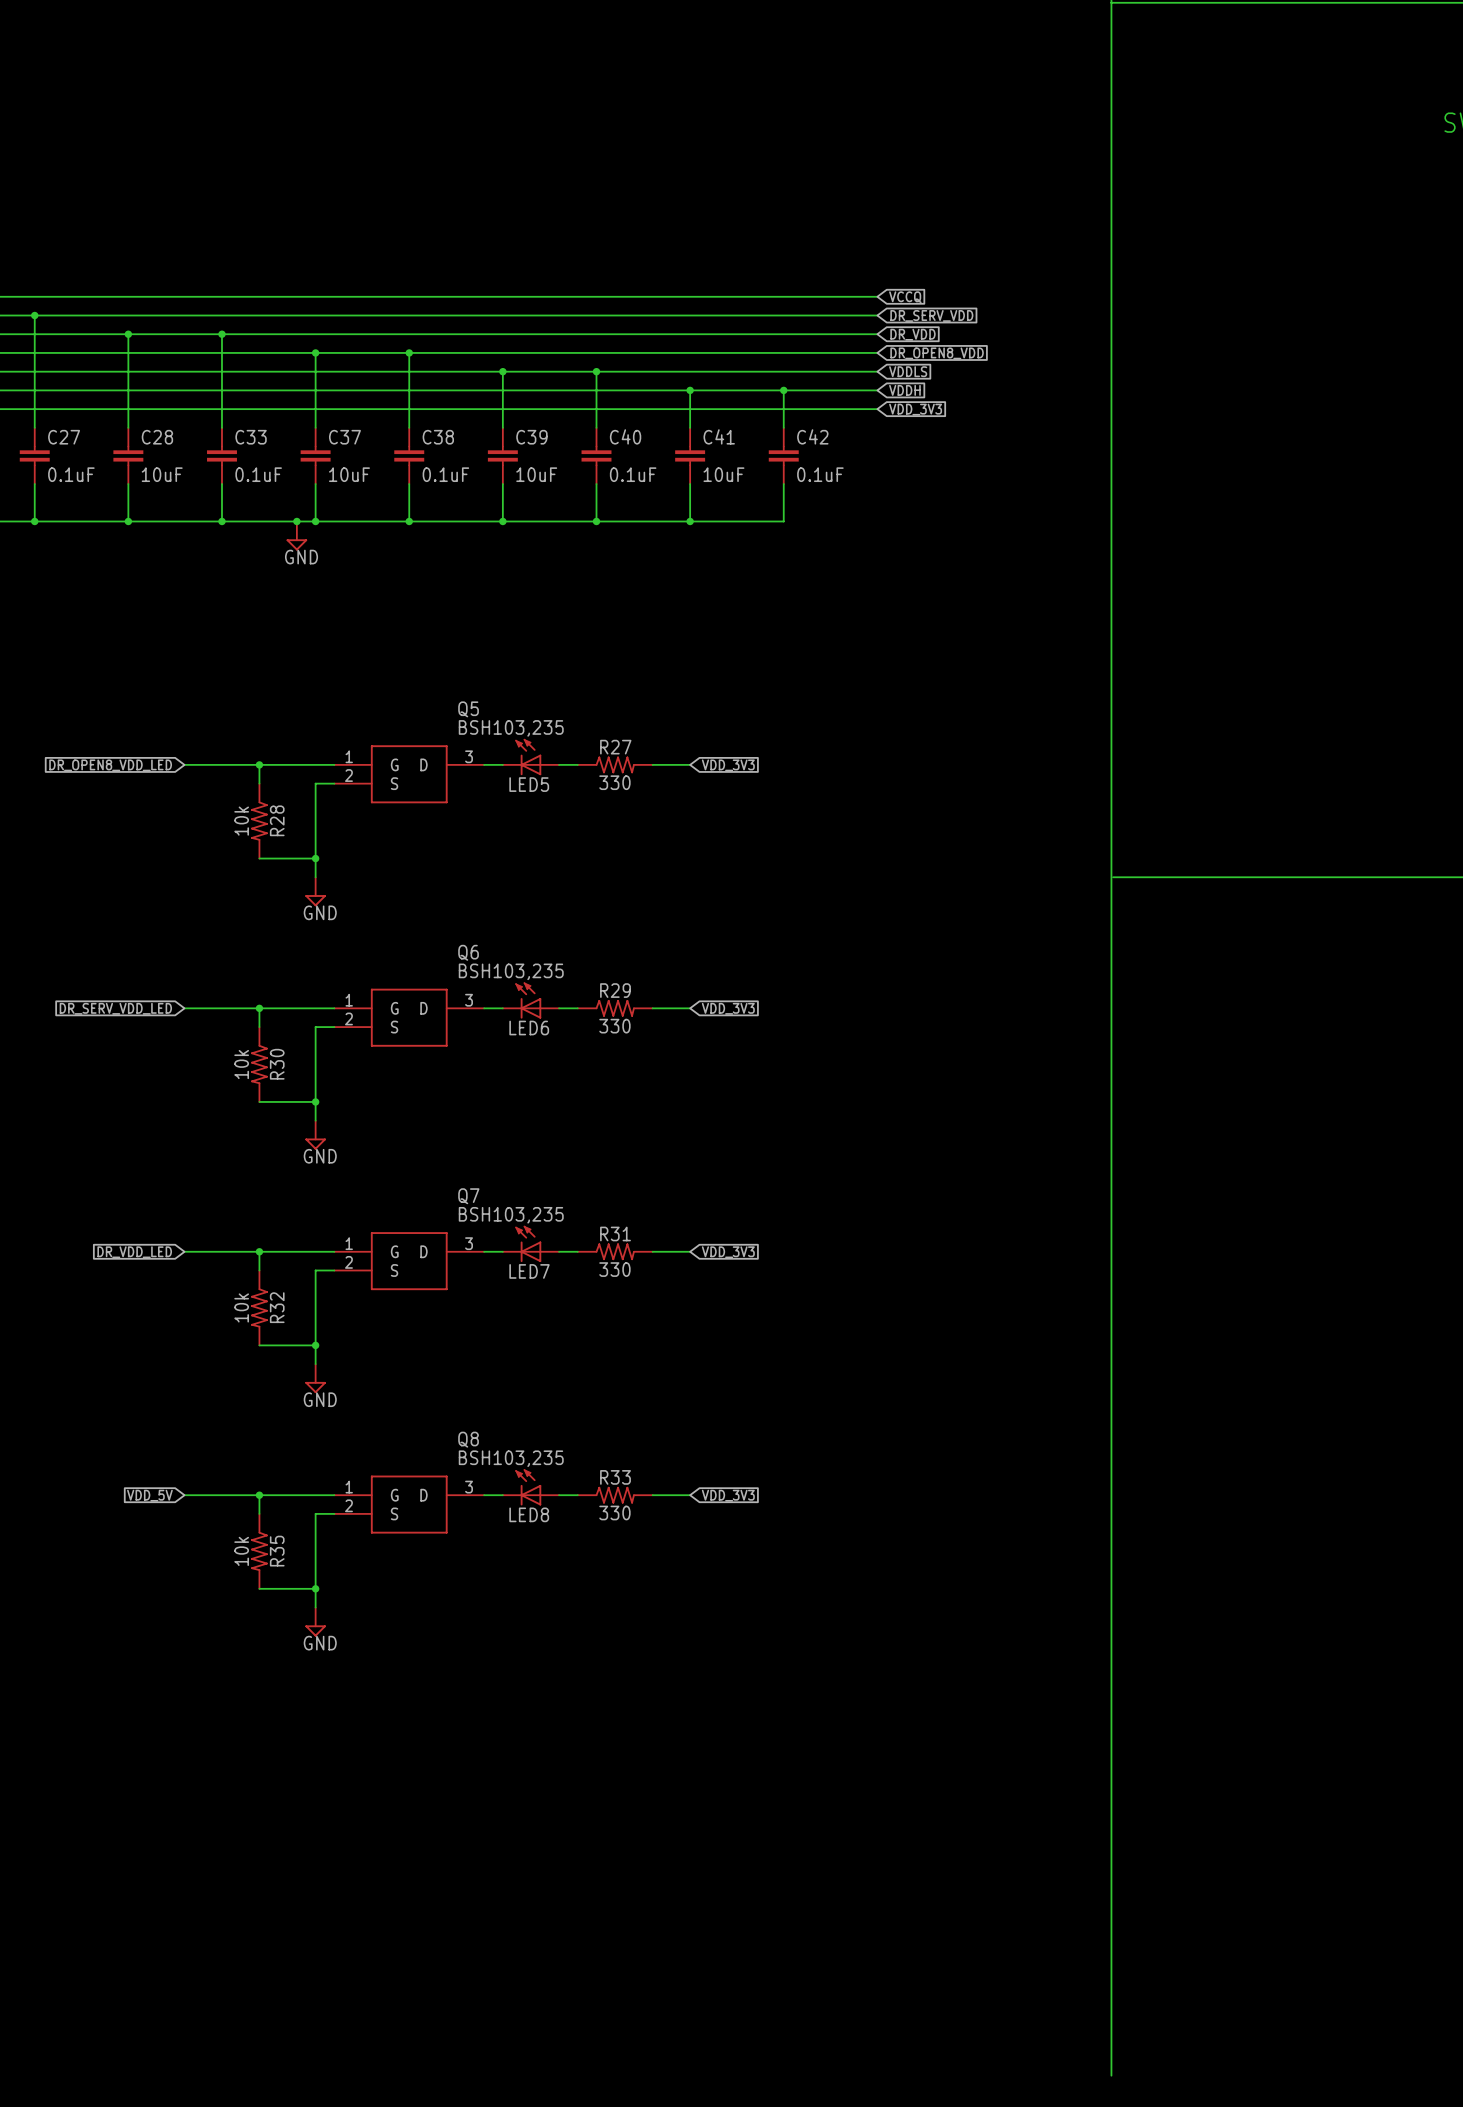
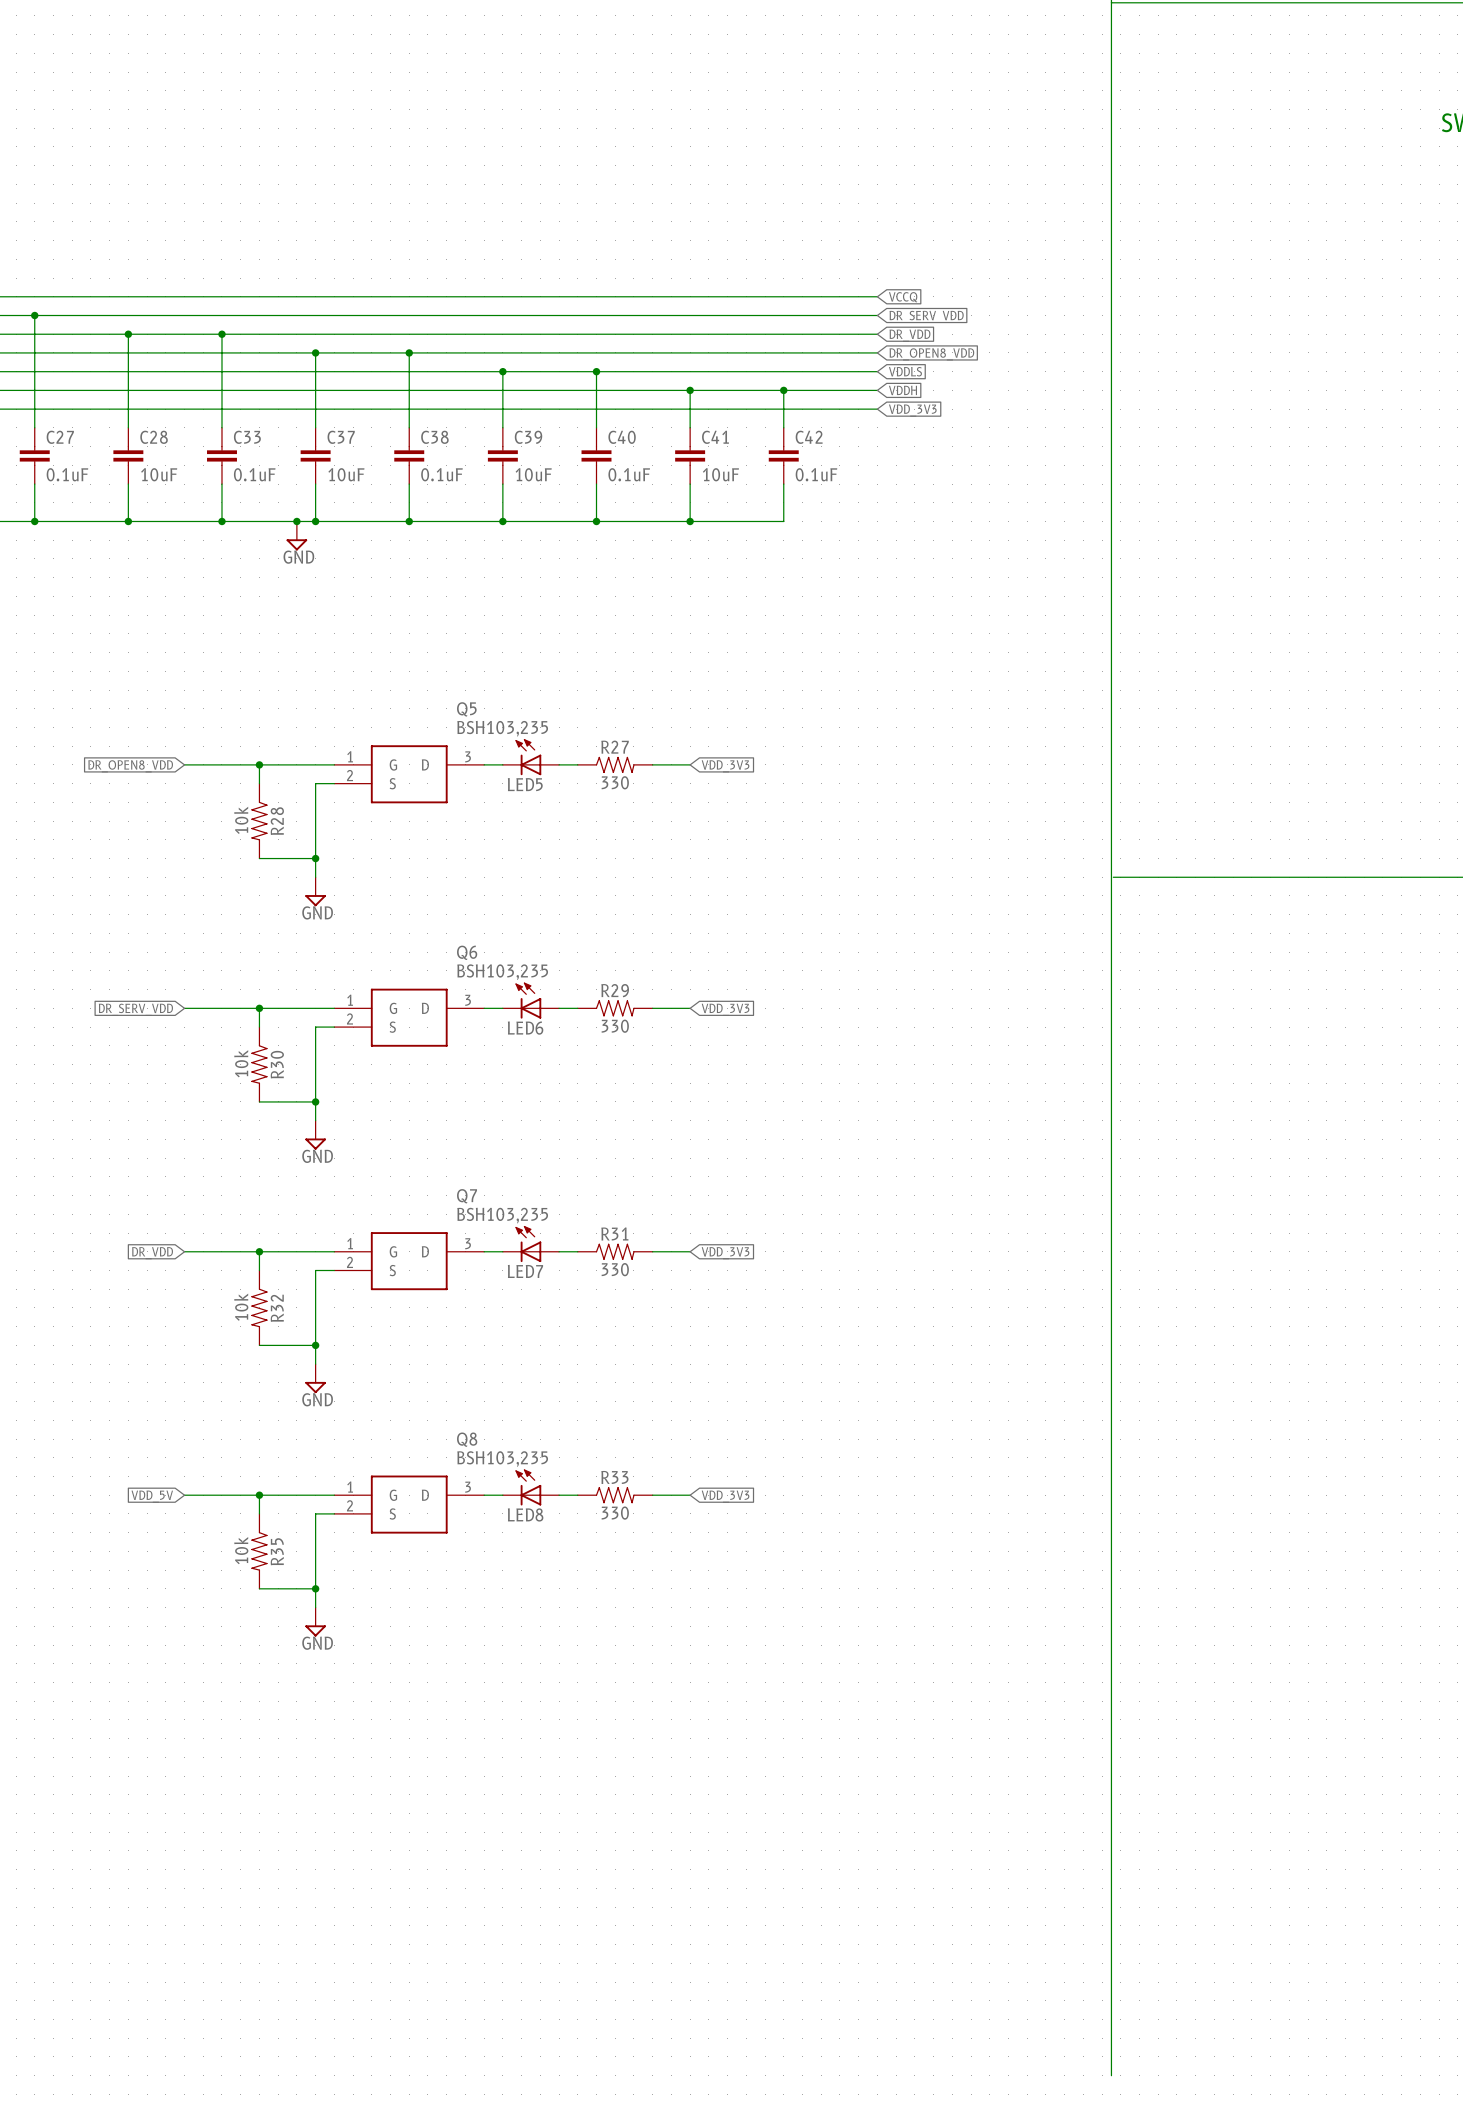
global label: DR_OPEN8_VDD_LED (110, 765) -> DR_OPEN8_VDD (130, 766)
global label: DR_SERV_VDD_LED (115, 1008) -> DR_SERV_VDD (135, 1009)
global label: DR_VDD_LED (134, 1252) -> DR_VDD (152, 1253)

